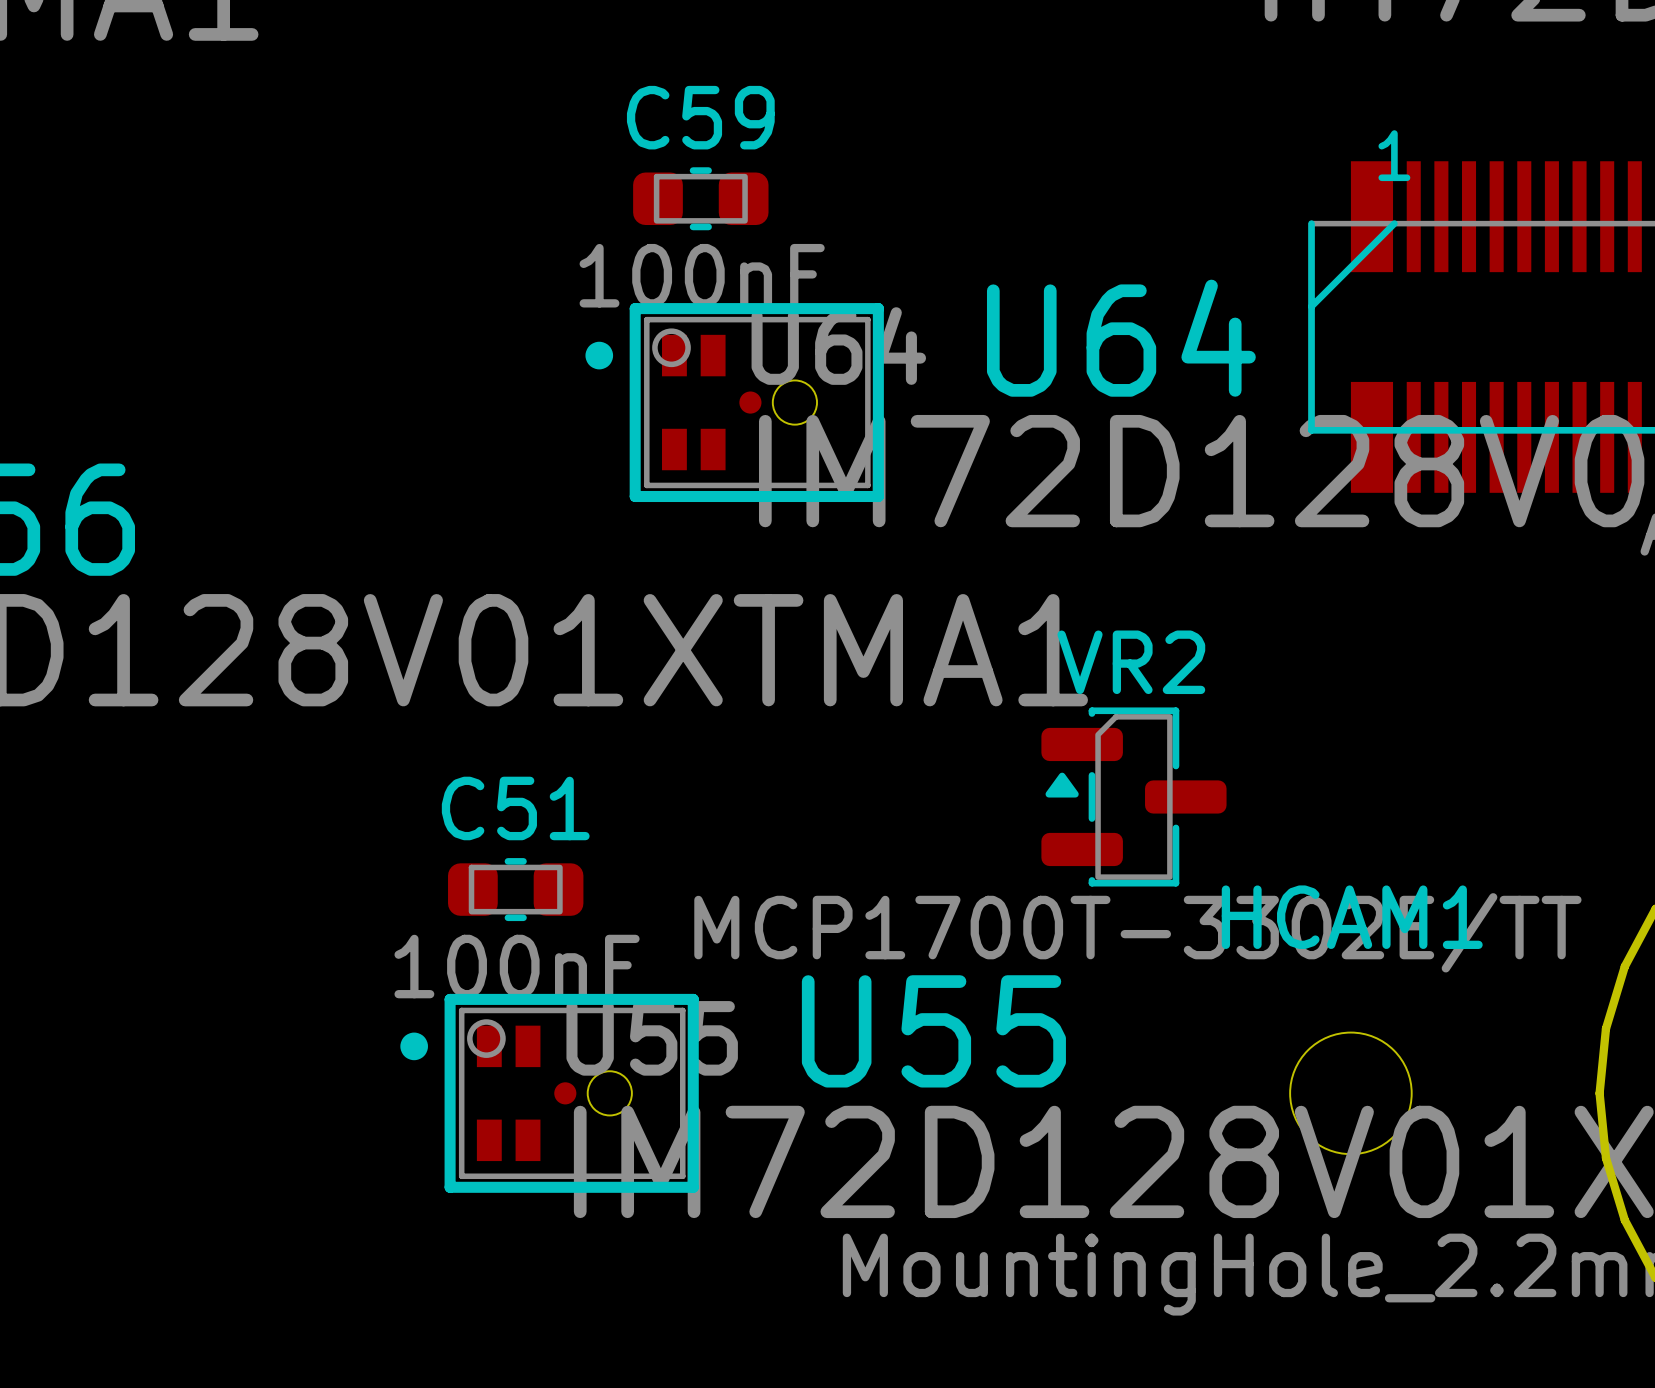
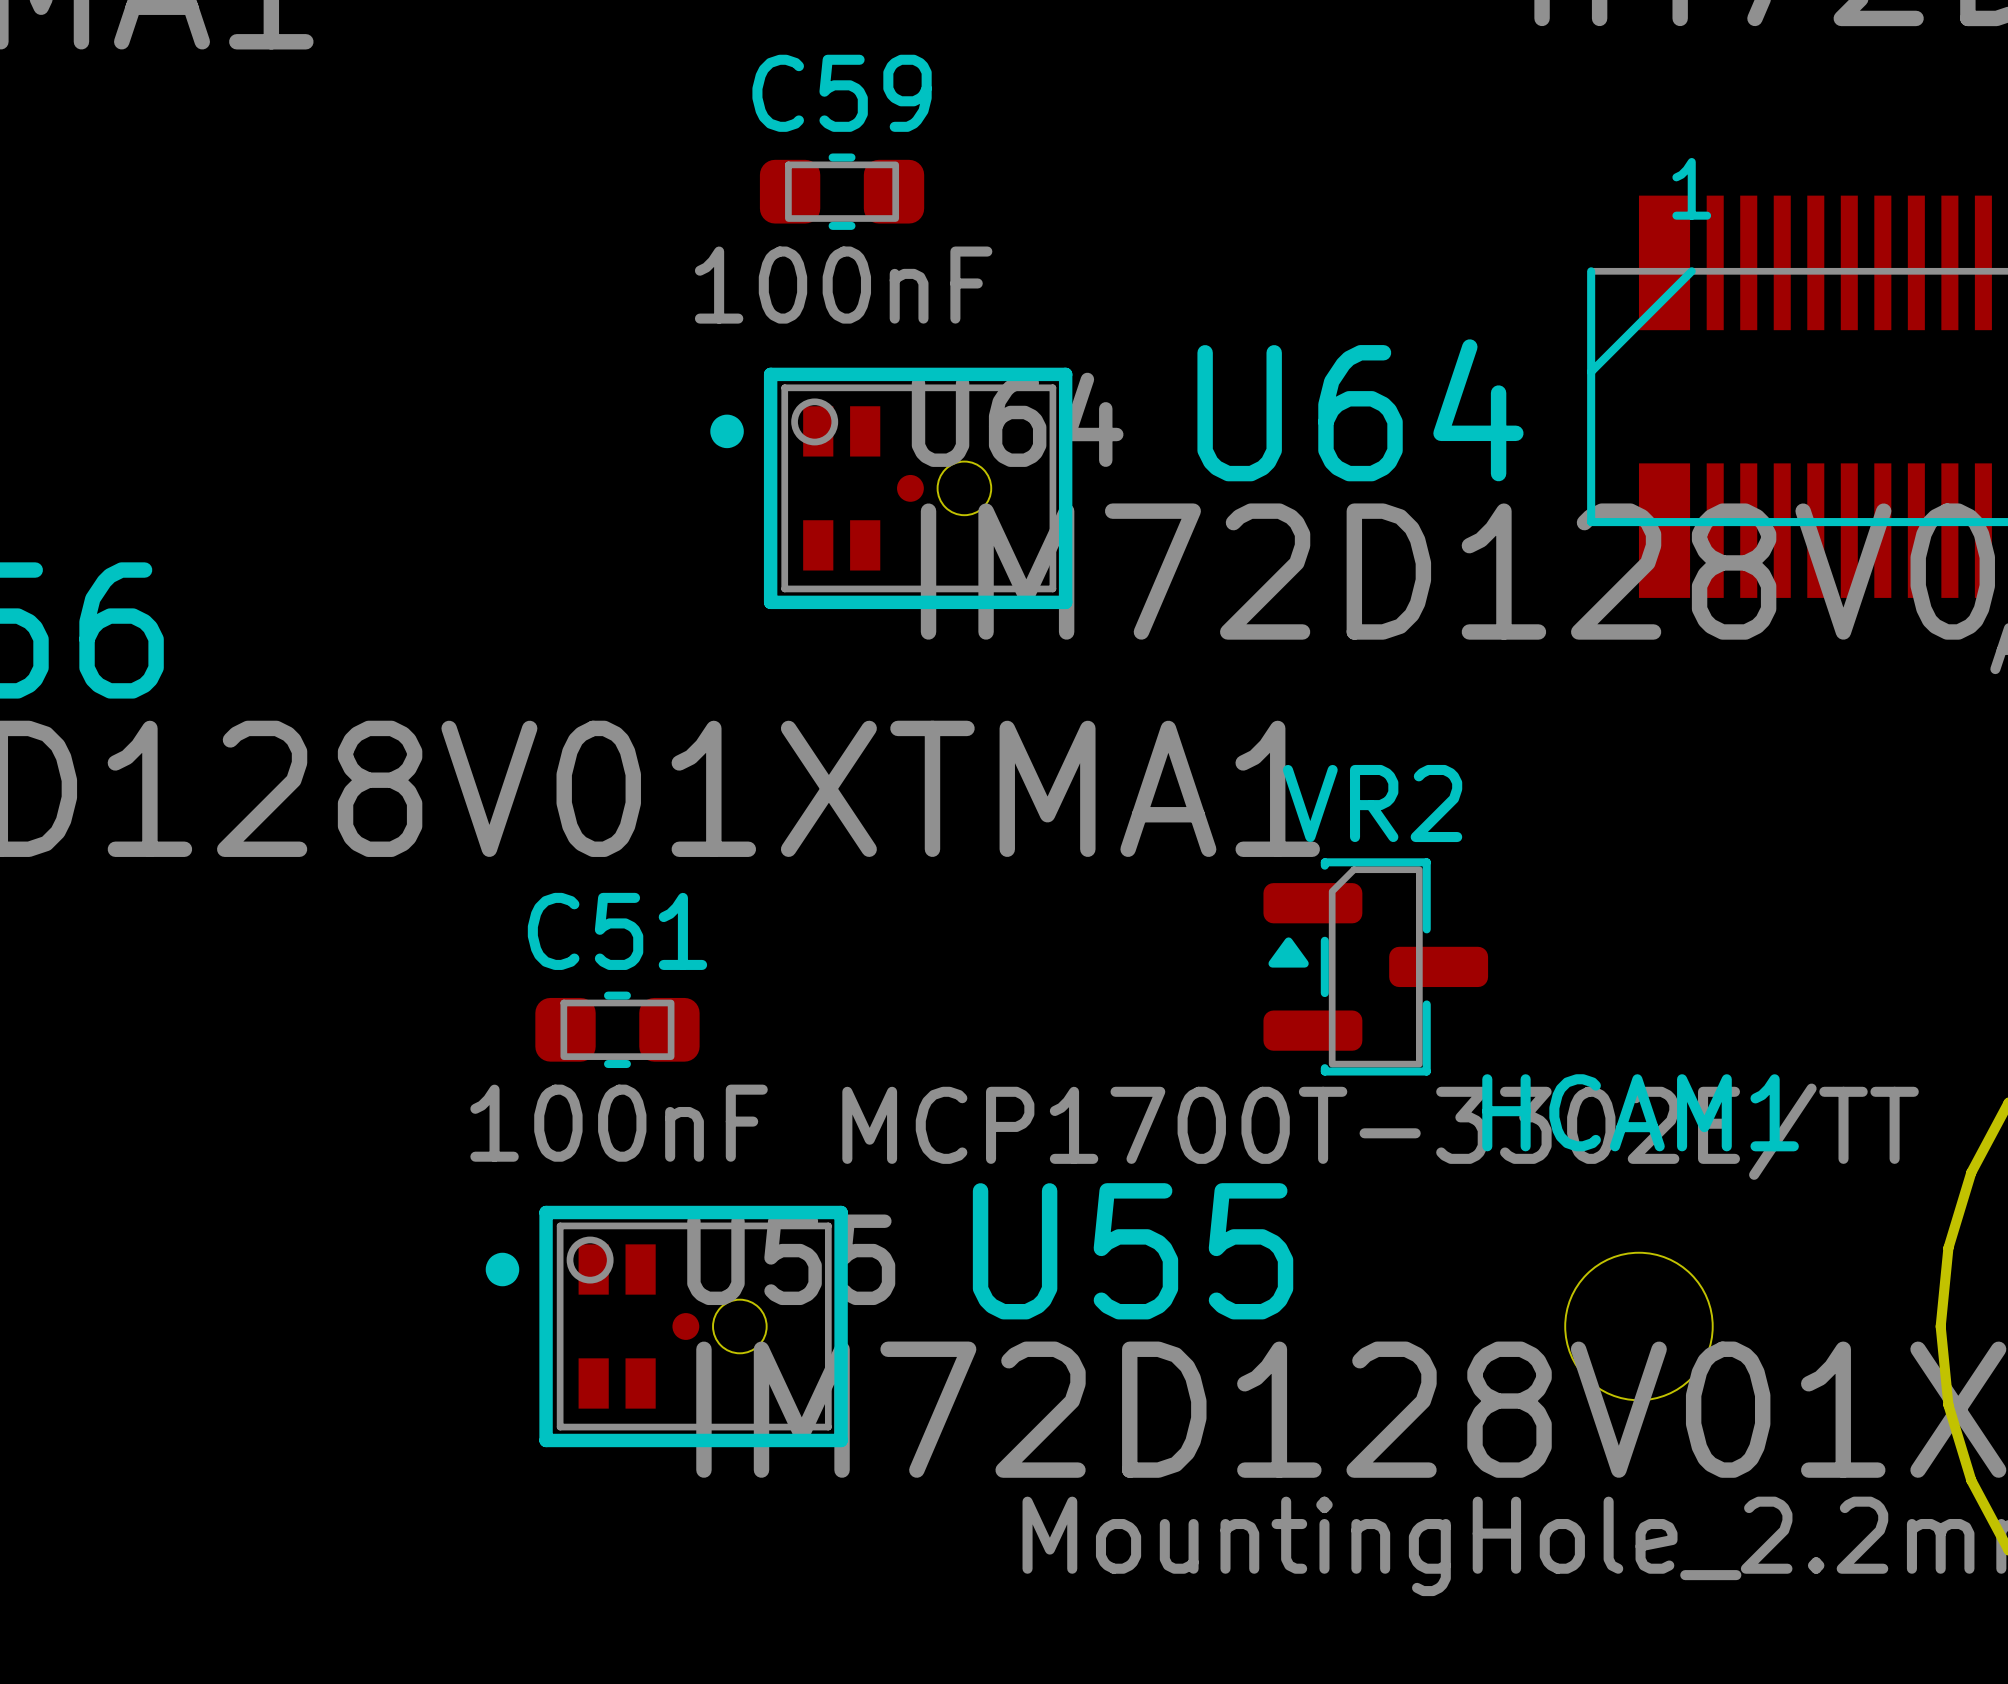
C59 position: (700, 198) -> (842, 191)
C51 position: (515, 889) -> (617, 1029)

